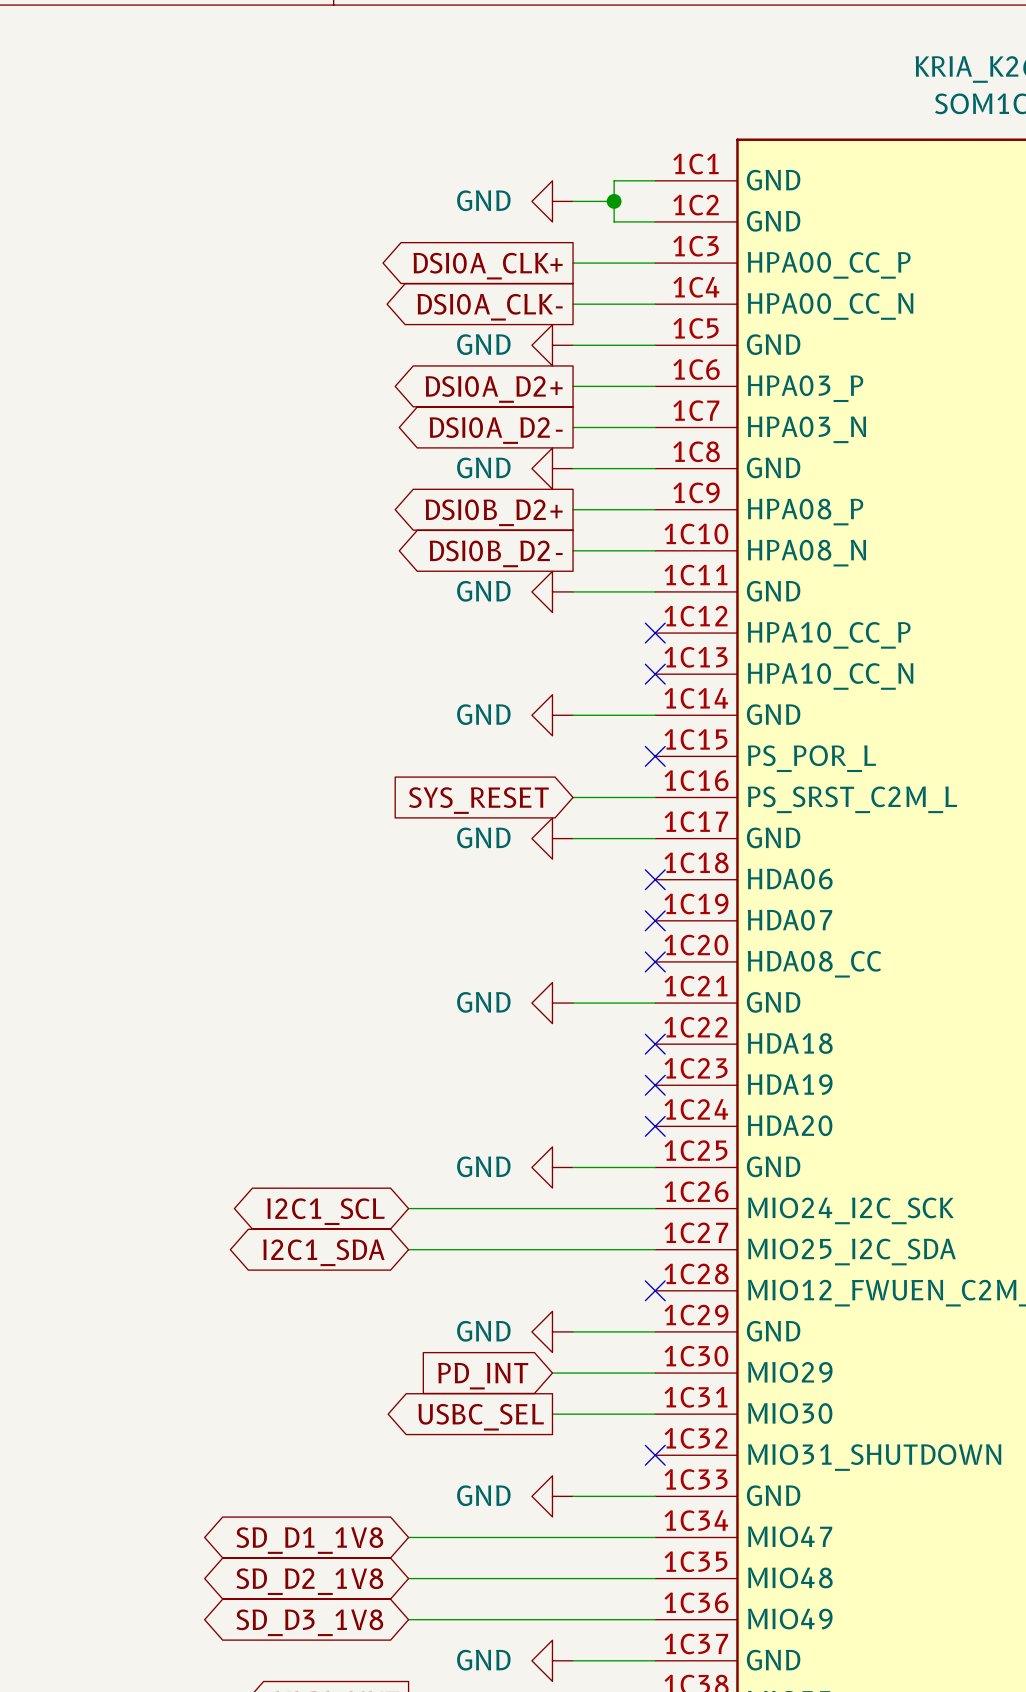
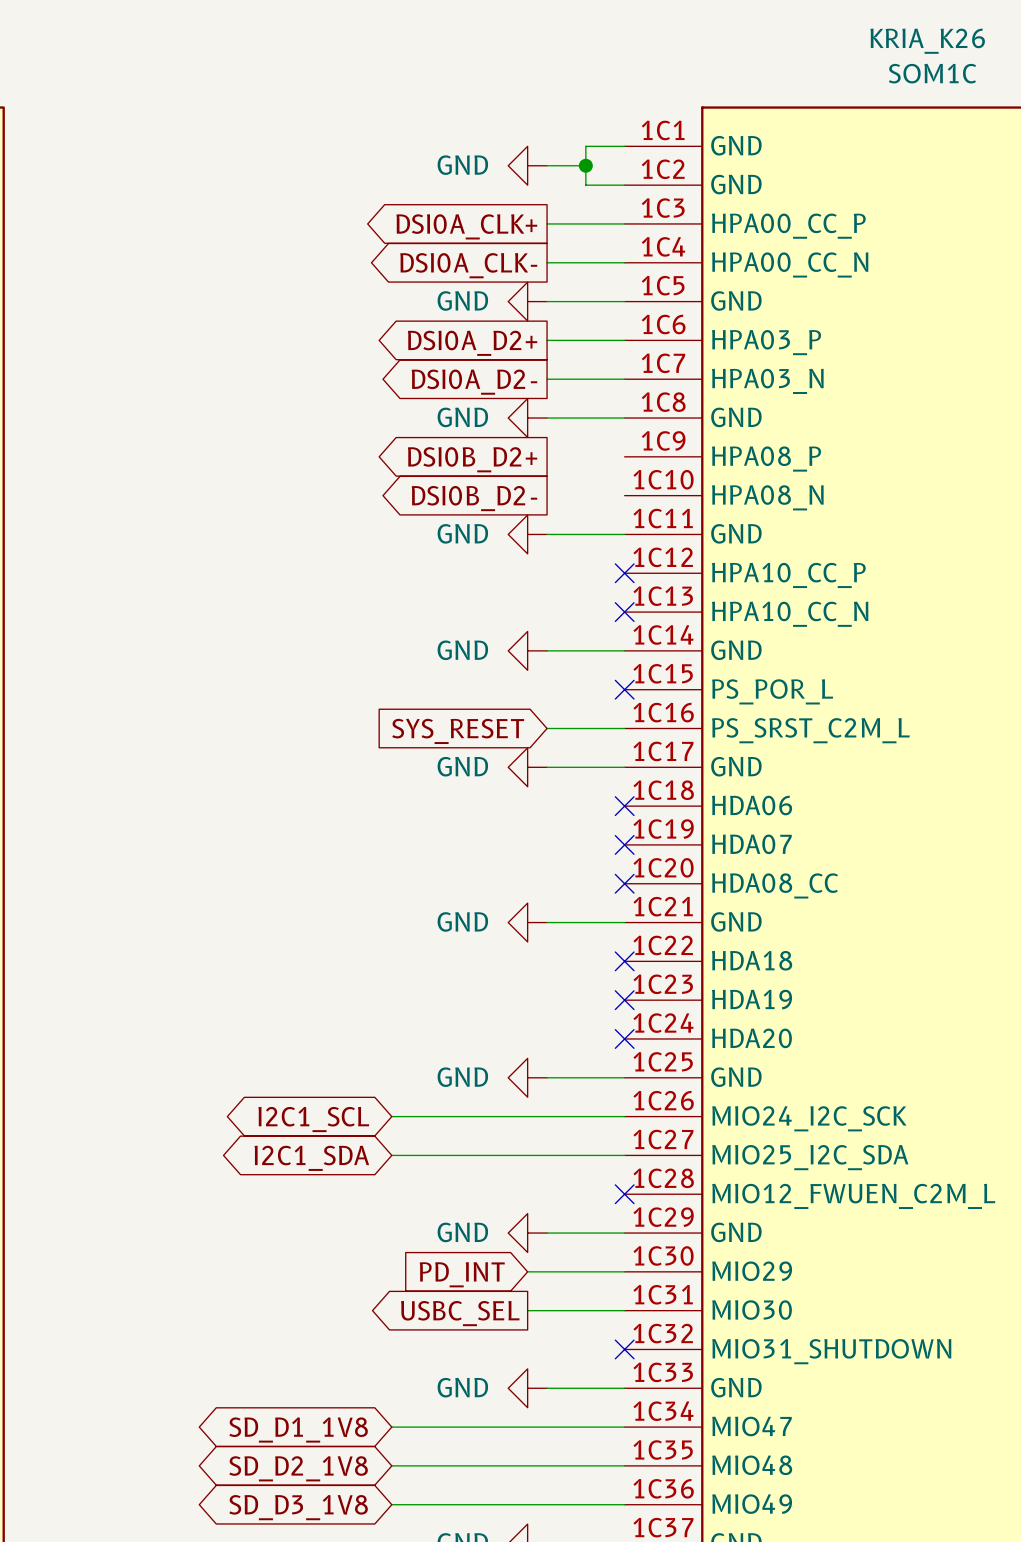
wire: (573, 509) (655, 509) -> none
wire: (573, 550) (655, 550) -> none

